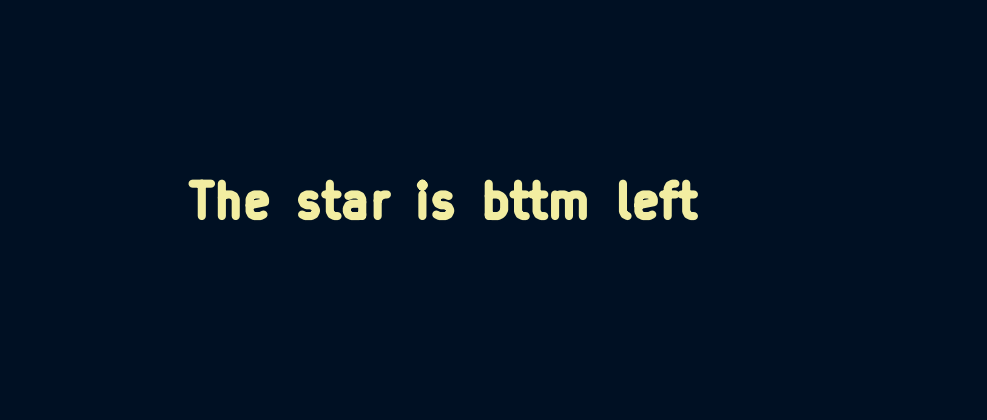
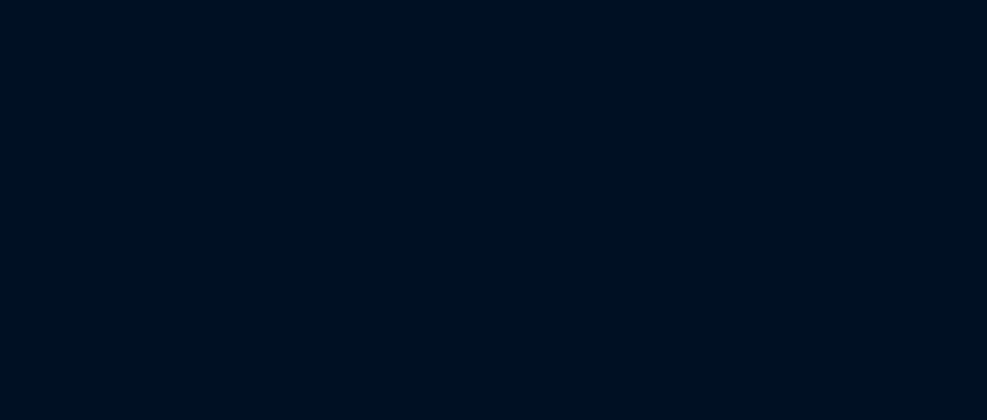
text: The star is bttm left (443, 199) -> none

